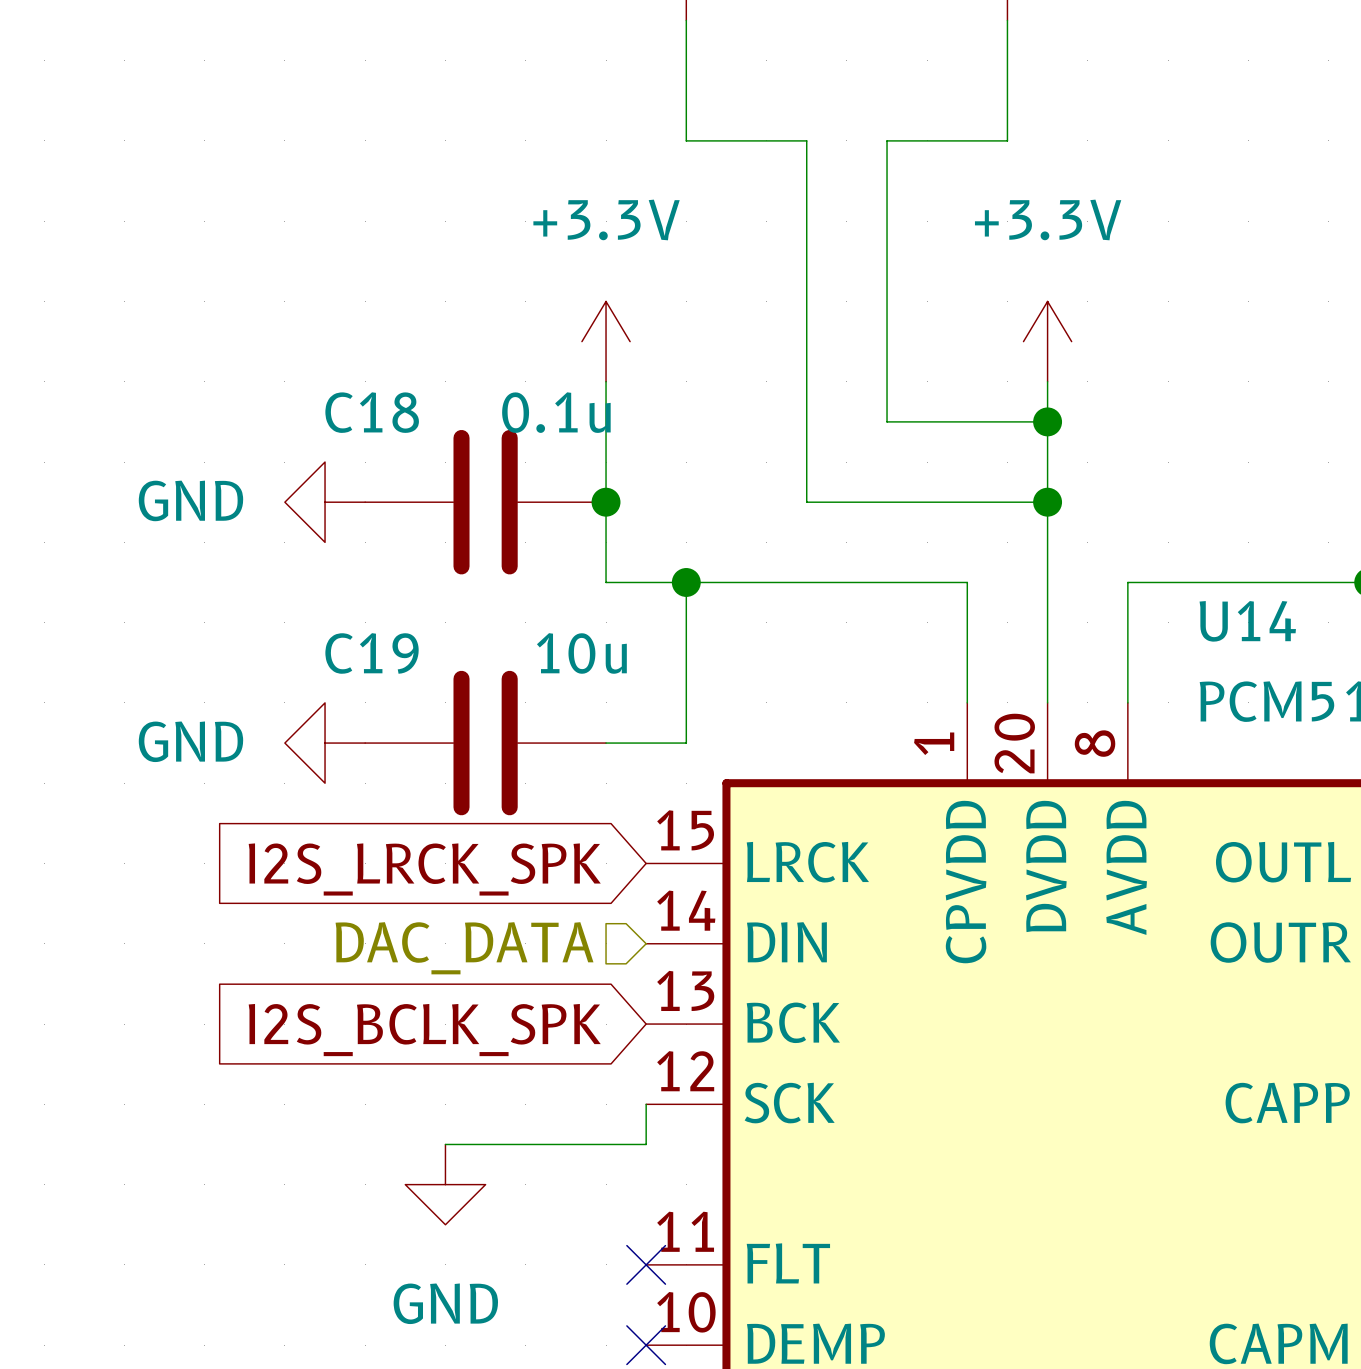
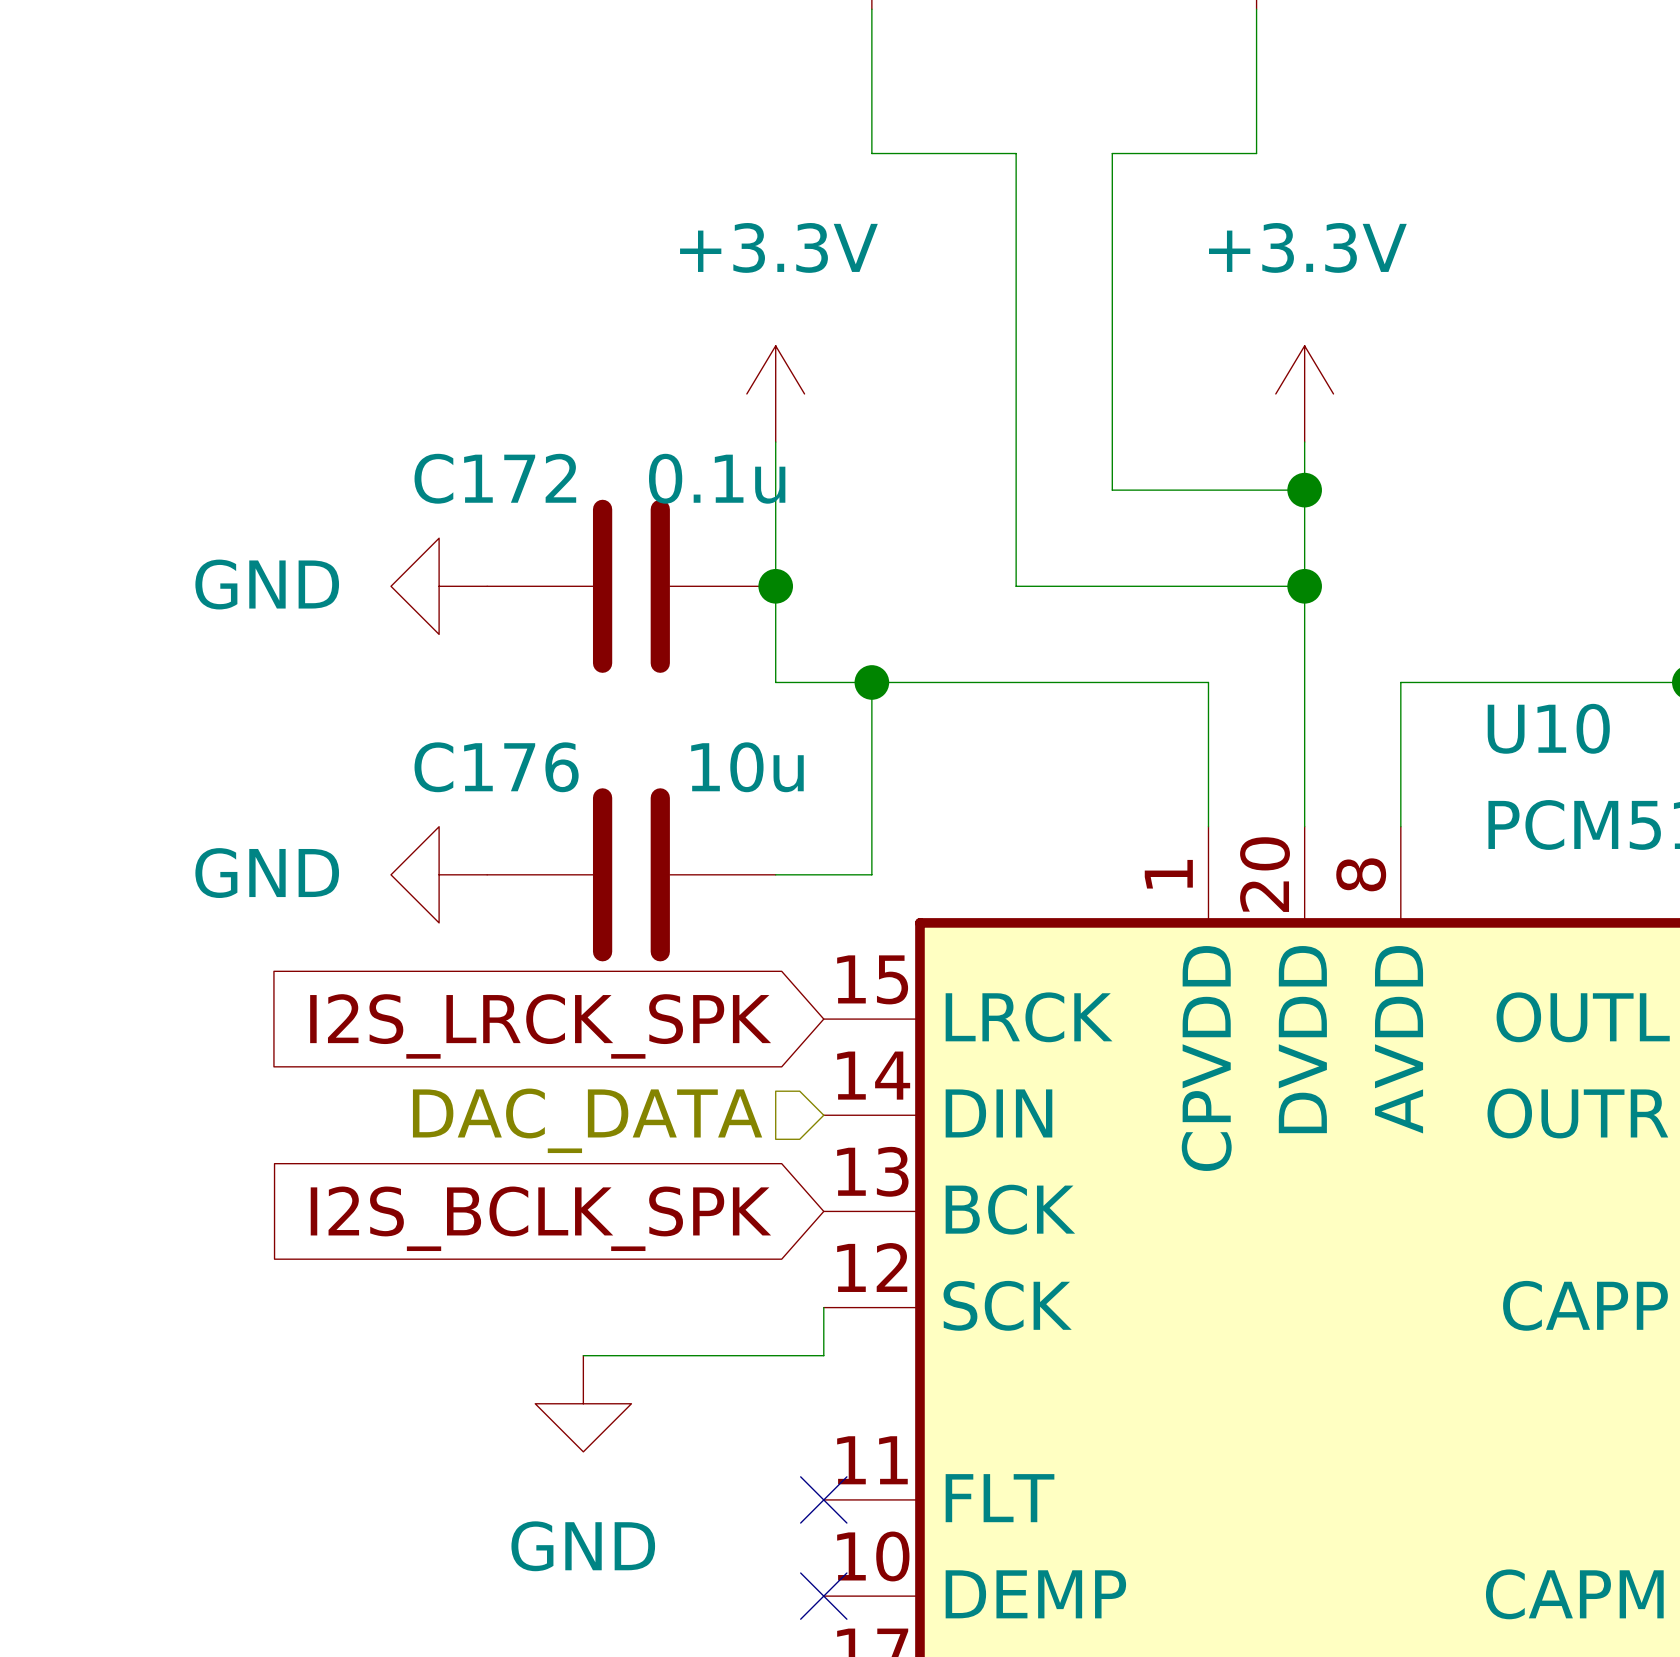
C18 name: C18 (372, 412) -> C172 (495, 478)
U14 name: U14 (1247, 621) -> U10 (1548, 728)
C19 name: C19 (372, 653) -> C176 (496, 767)

